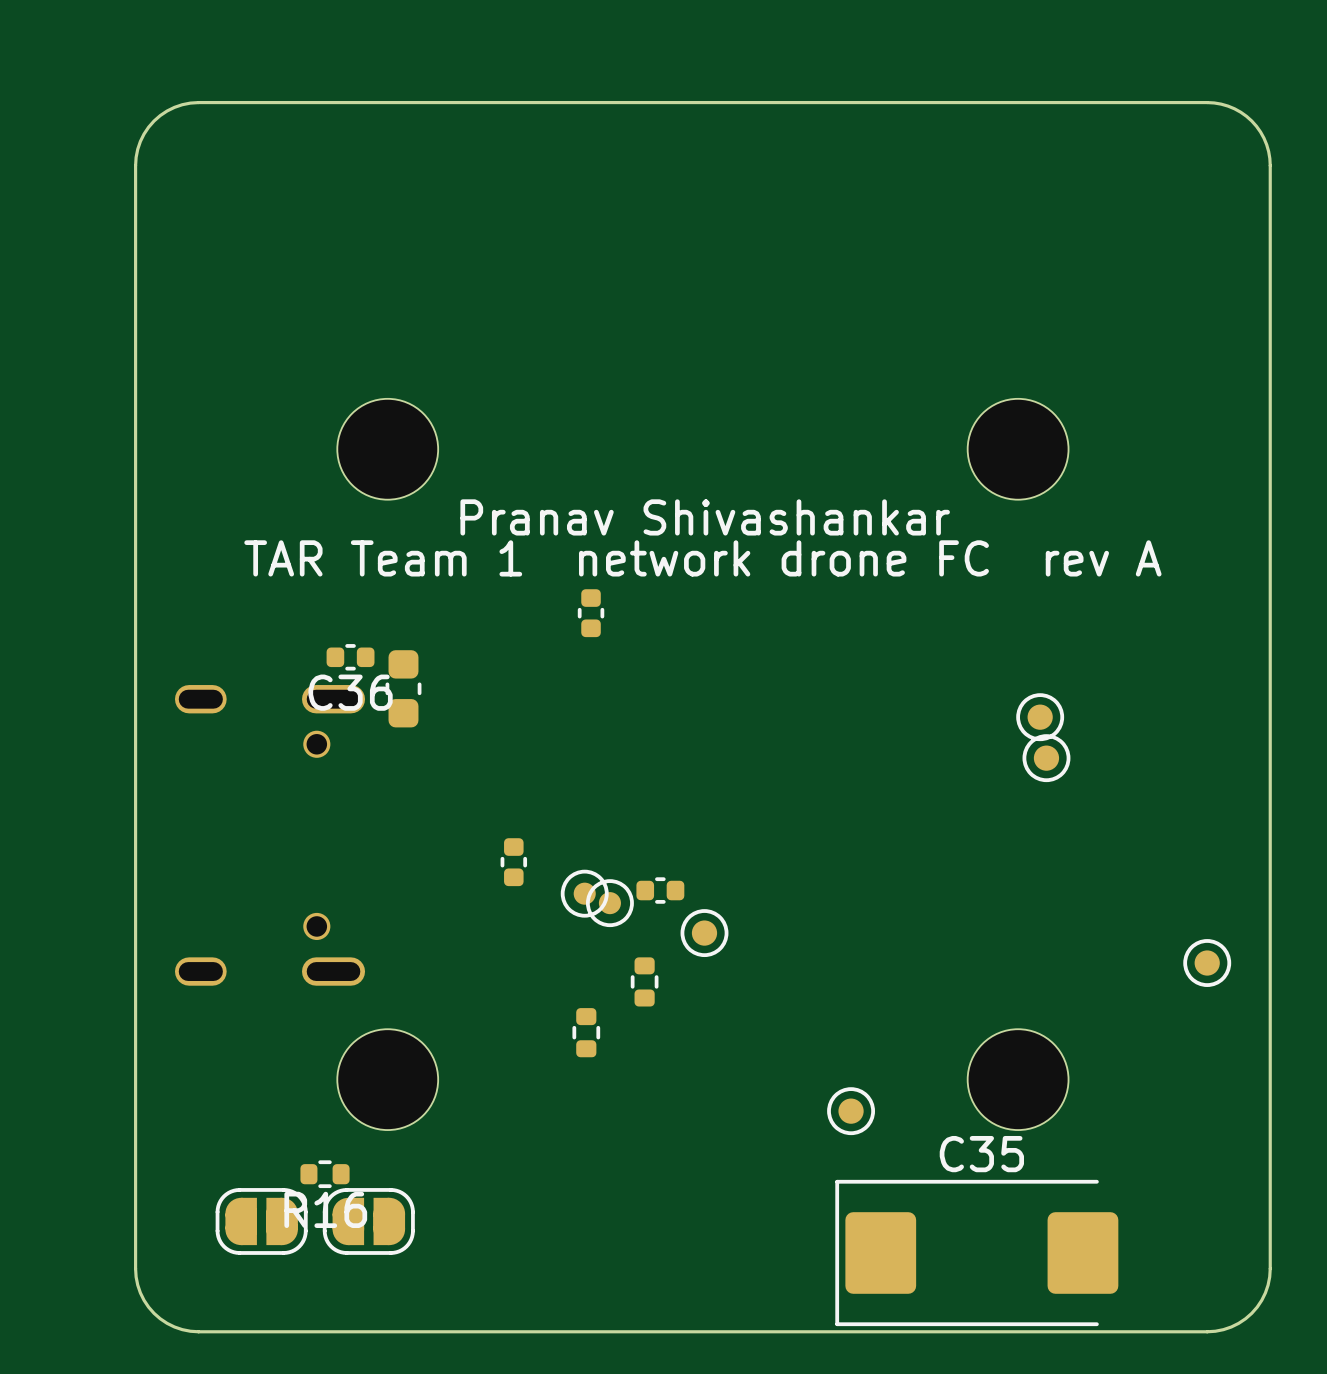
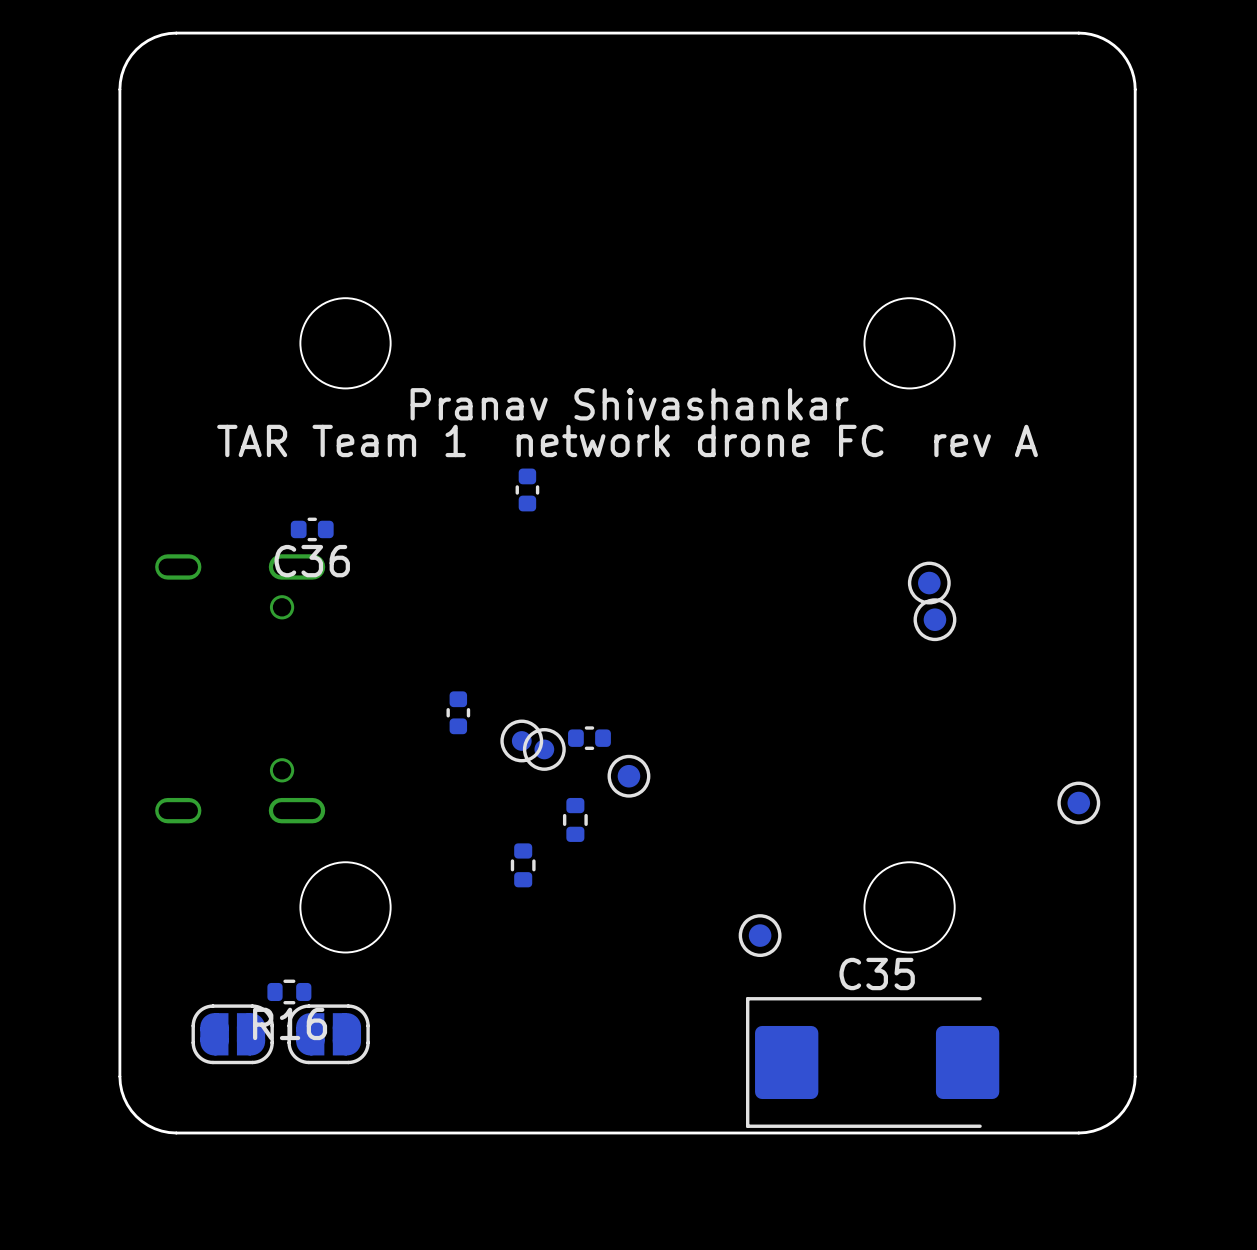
part: (403, 688) -> none

